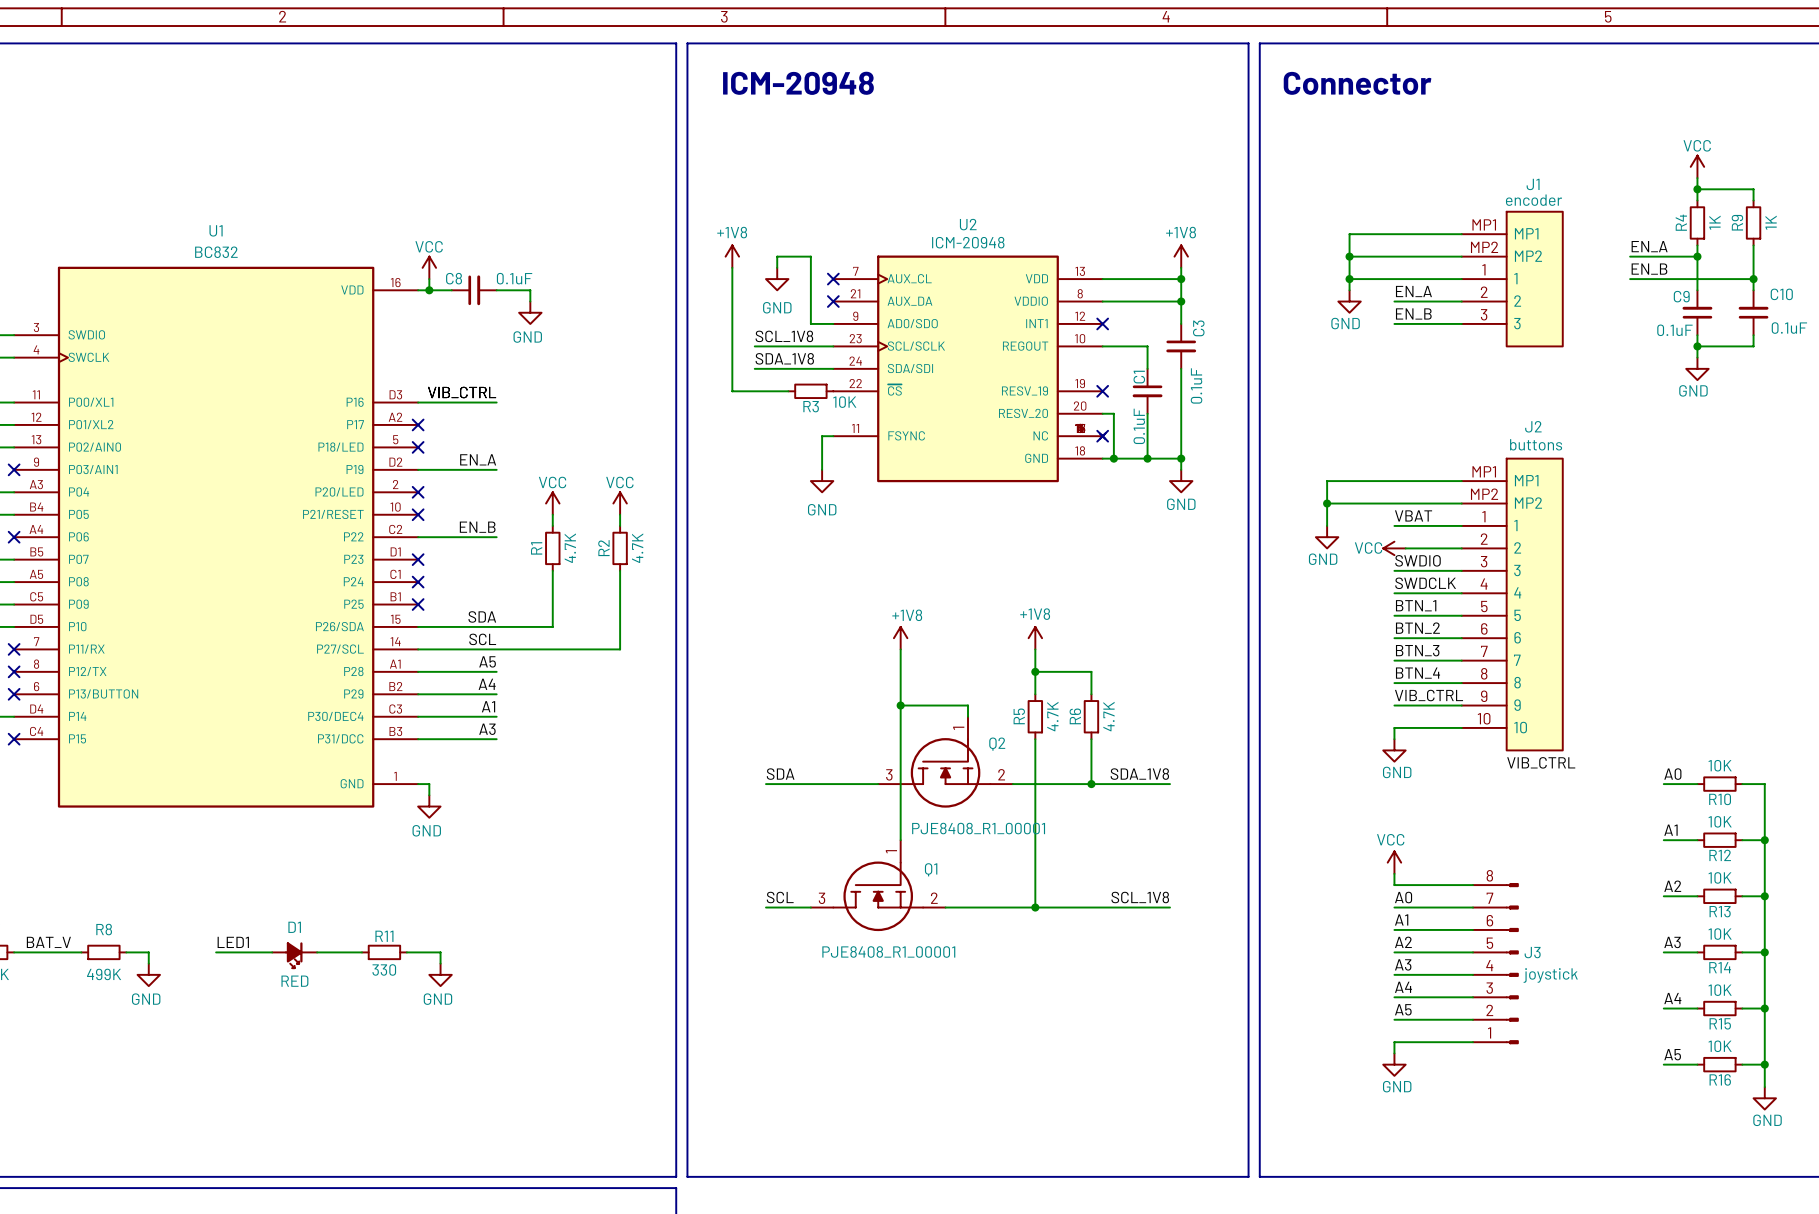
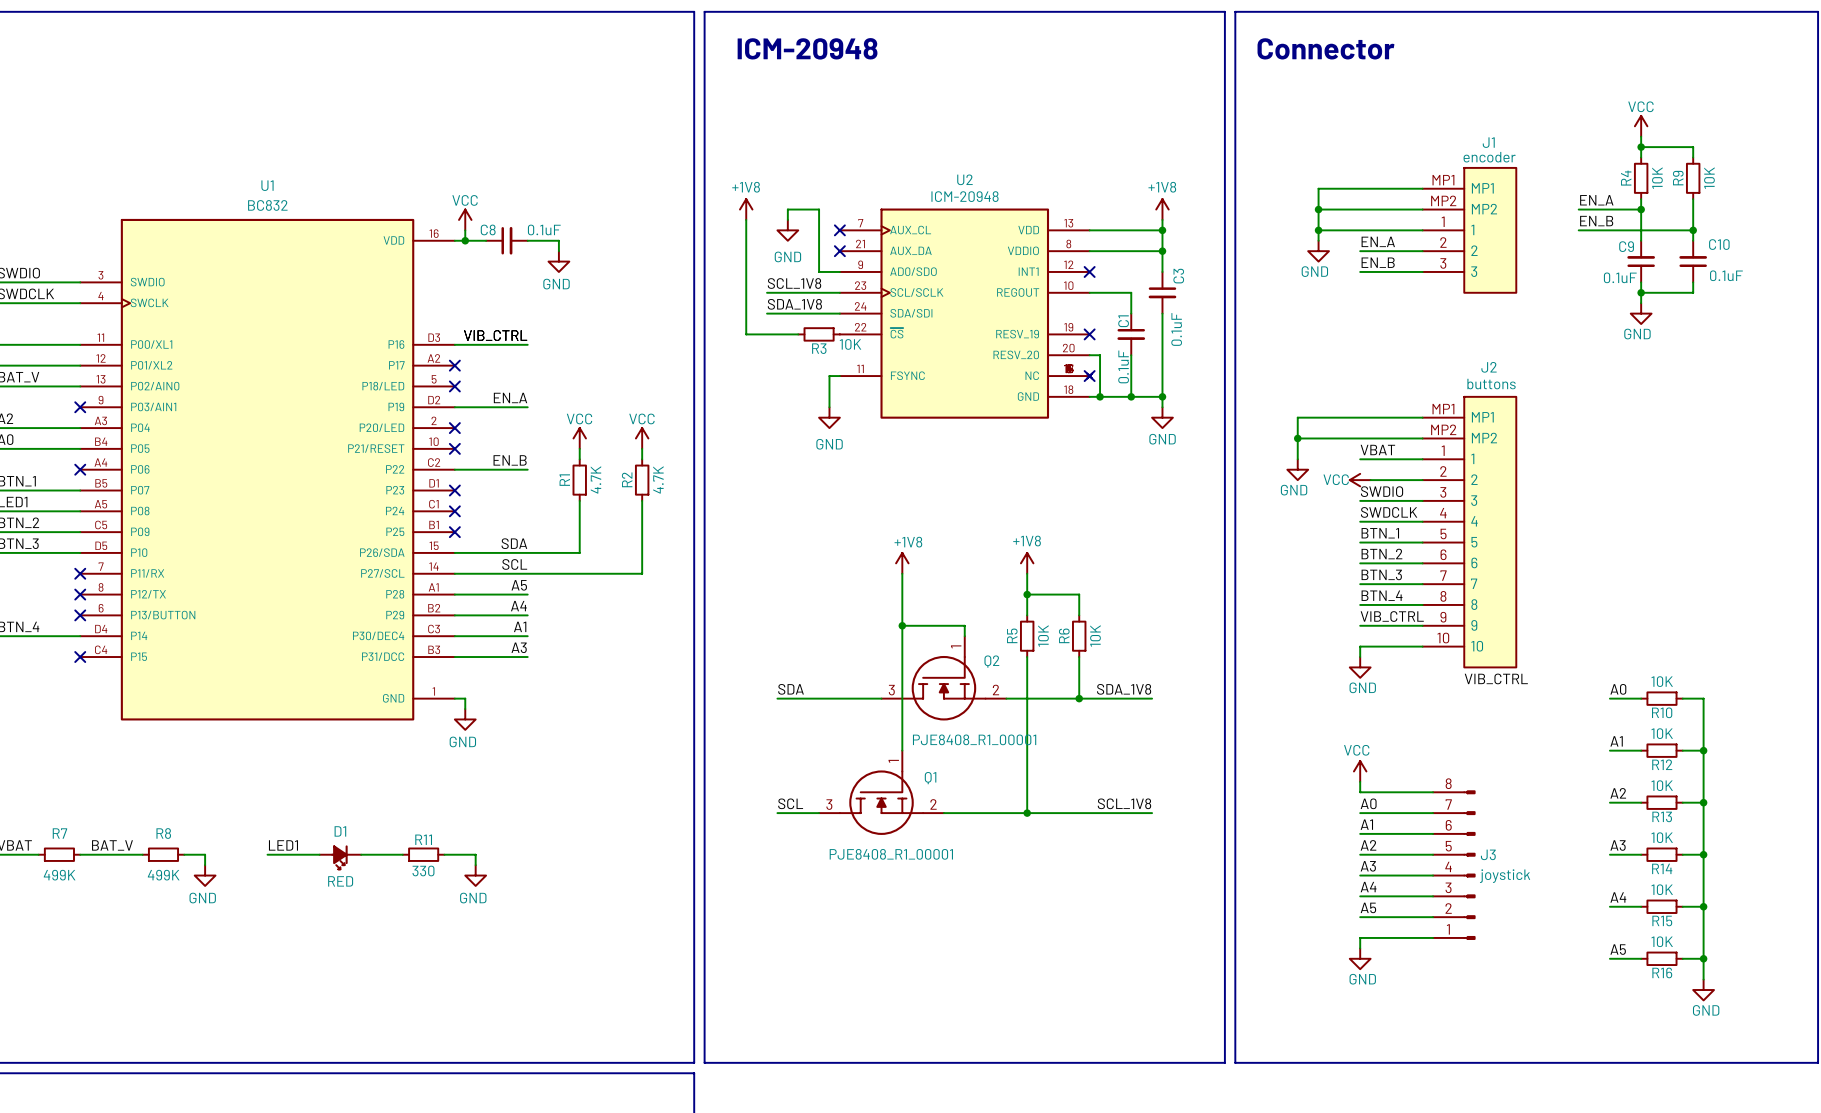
R4 value: 1K (1714, 222) -> 10K (1657, 178)
R9 value: 1K (1771, 222) -> 10K (1709, 178)
R5 value: 4.7K (1052, 716) -> 10K (1043, 635)
R6 value: 4.7K (1109, 716) -> 10K (1095, 635)

